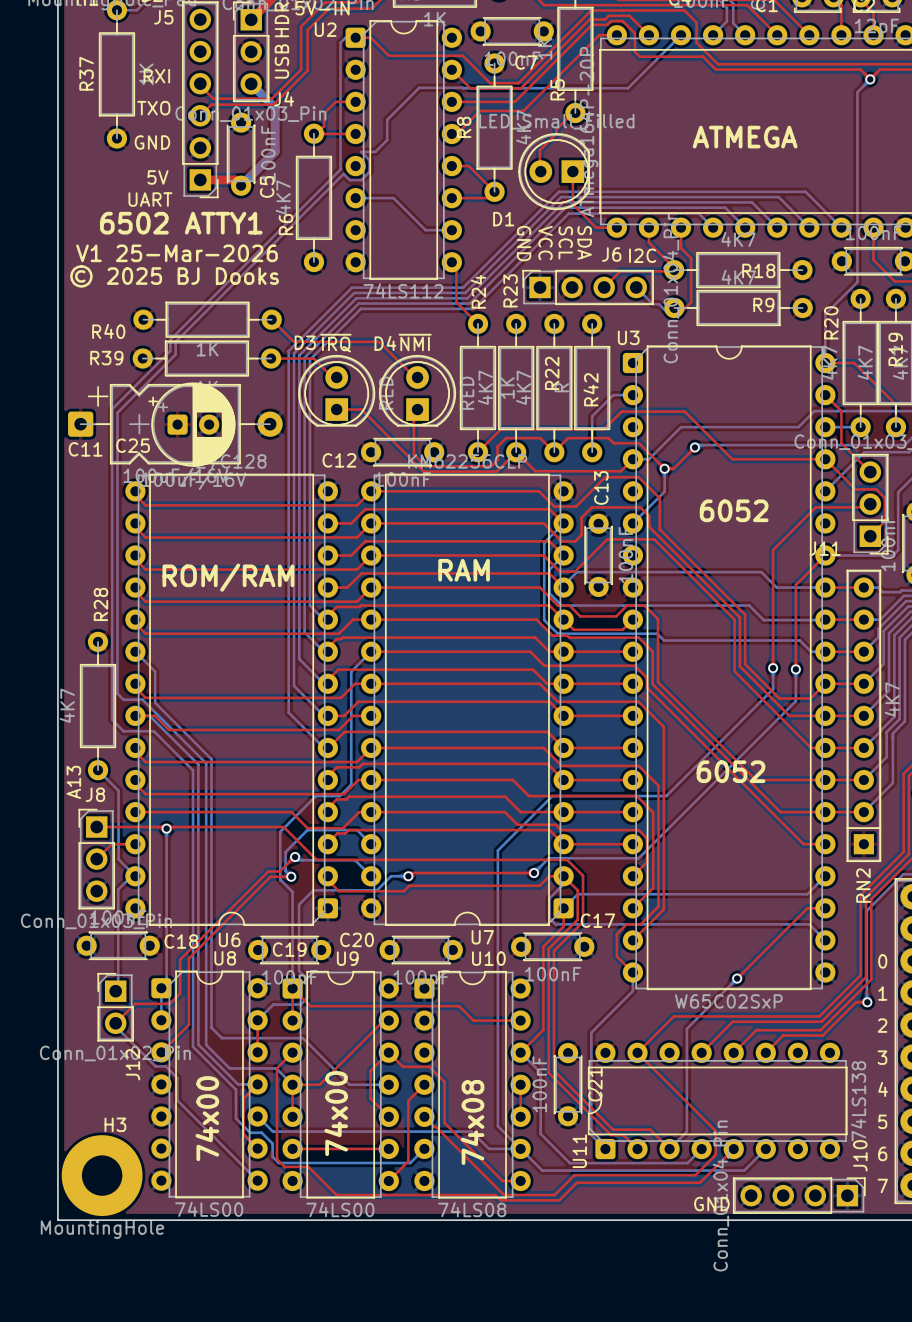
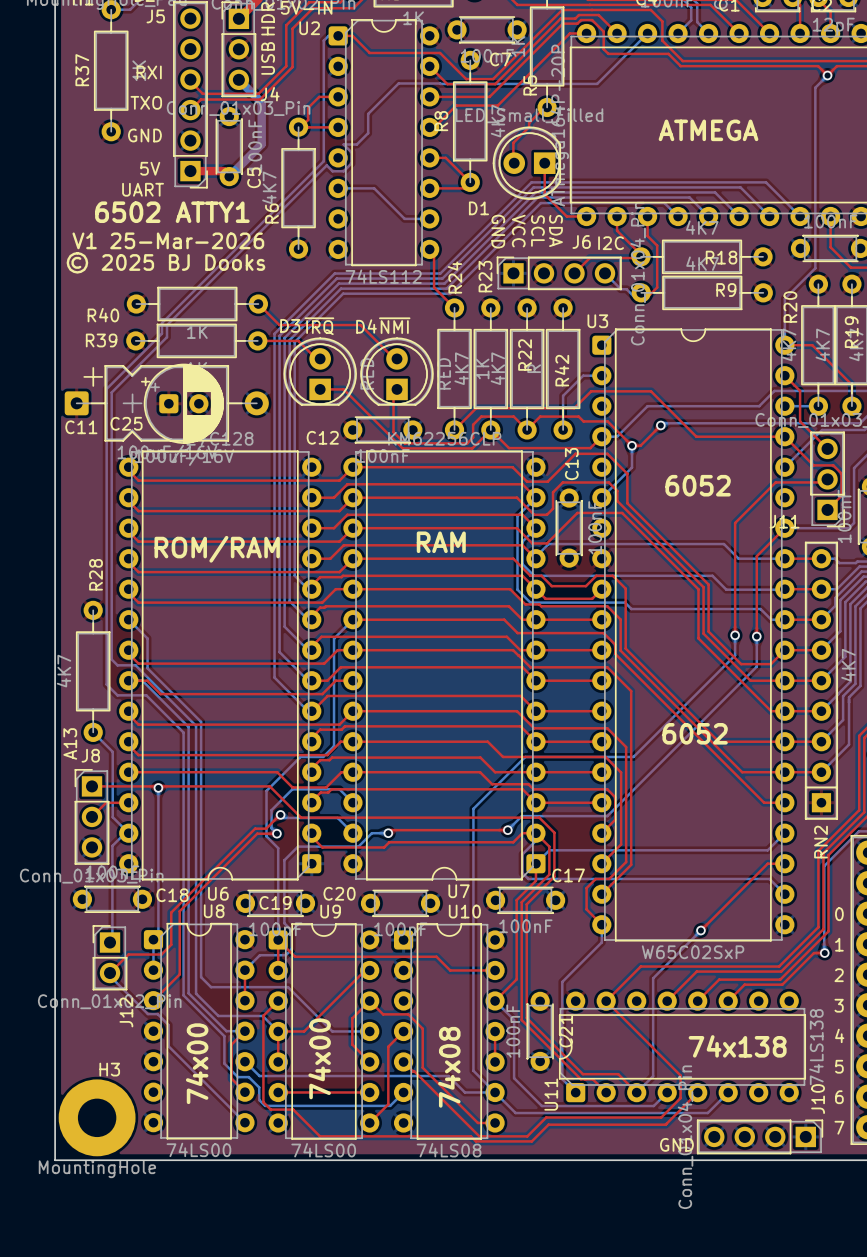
text: none -> 74x138 (737, 1046)

